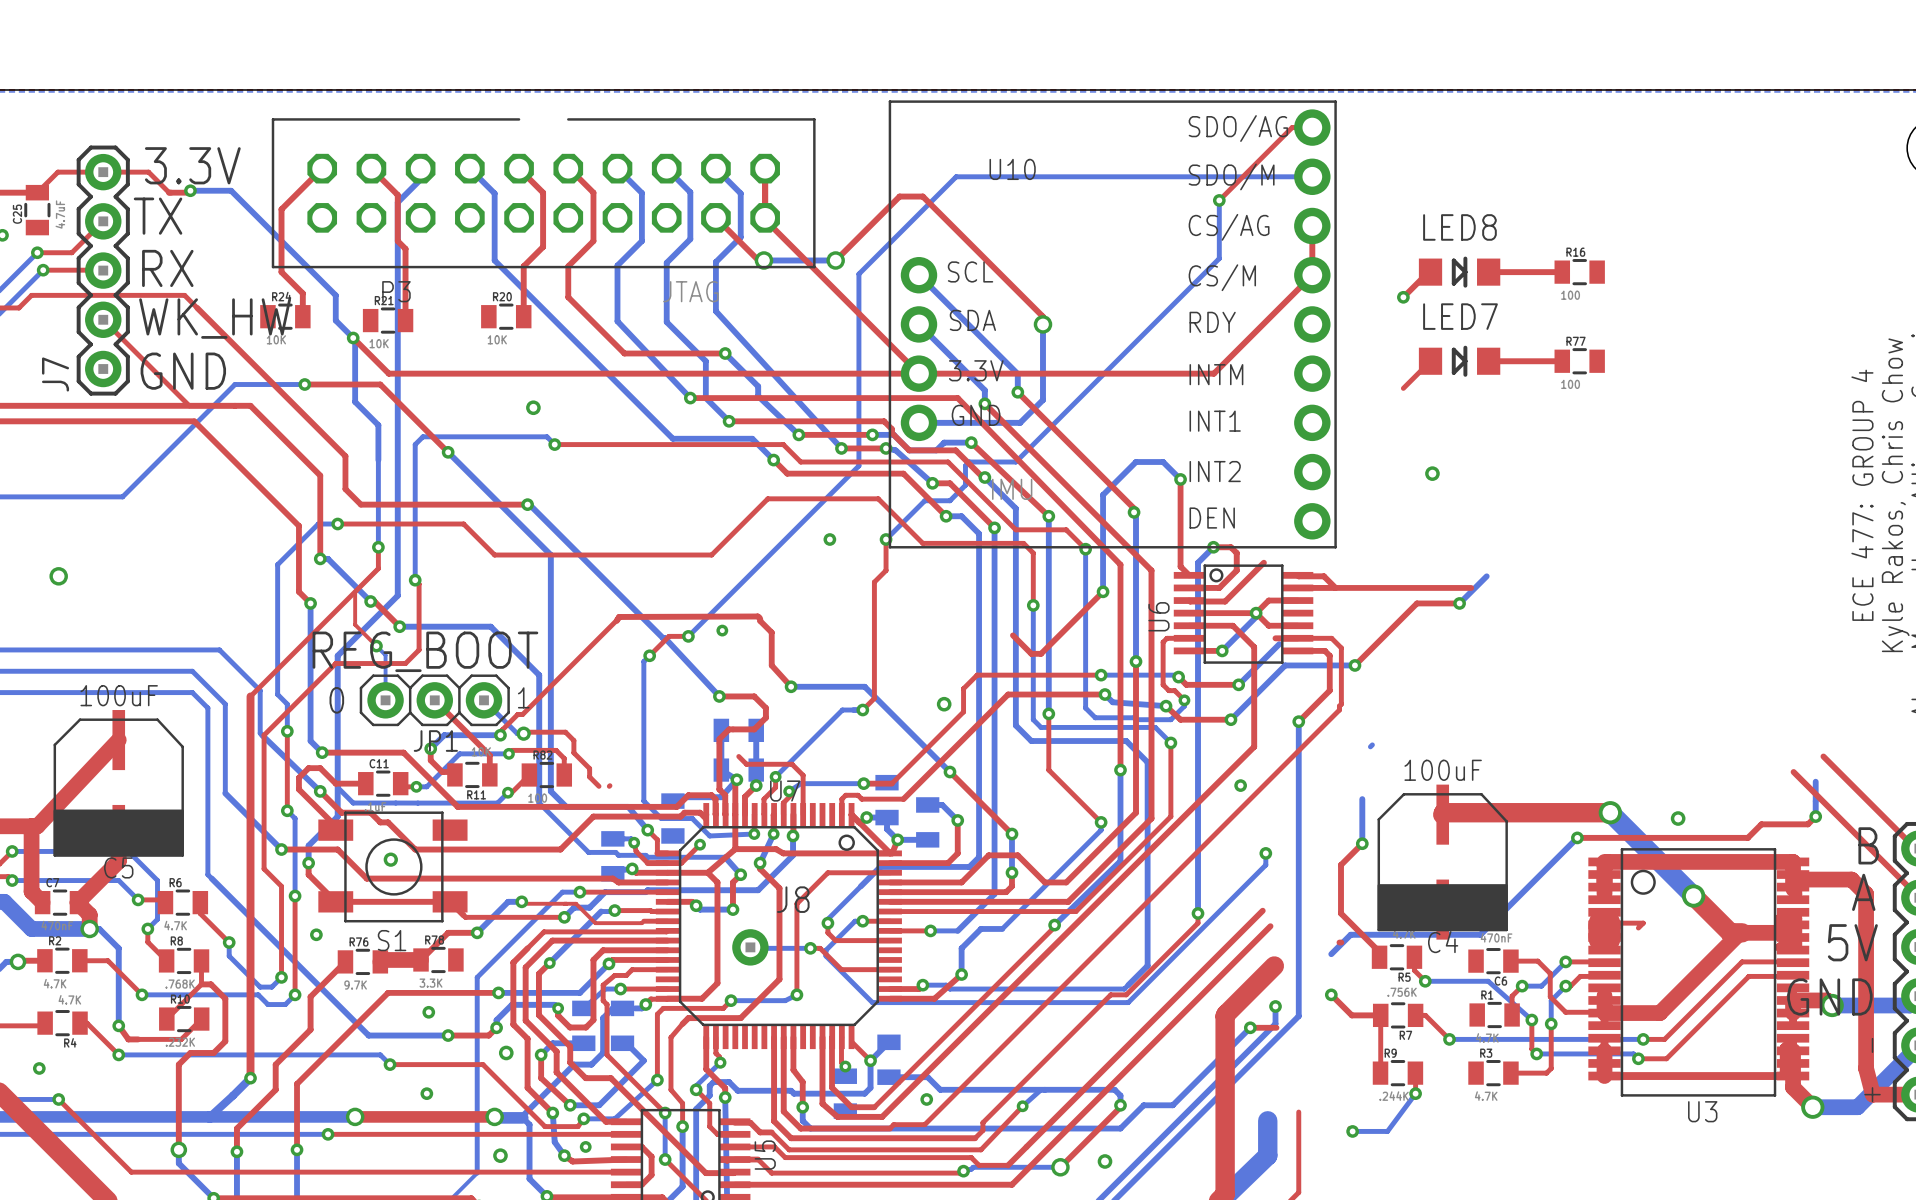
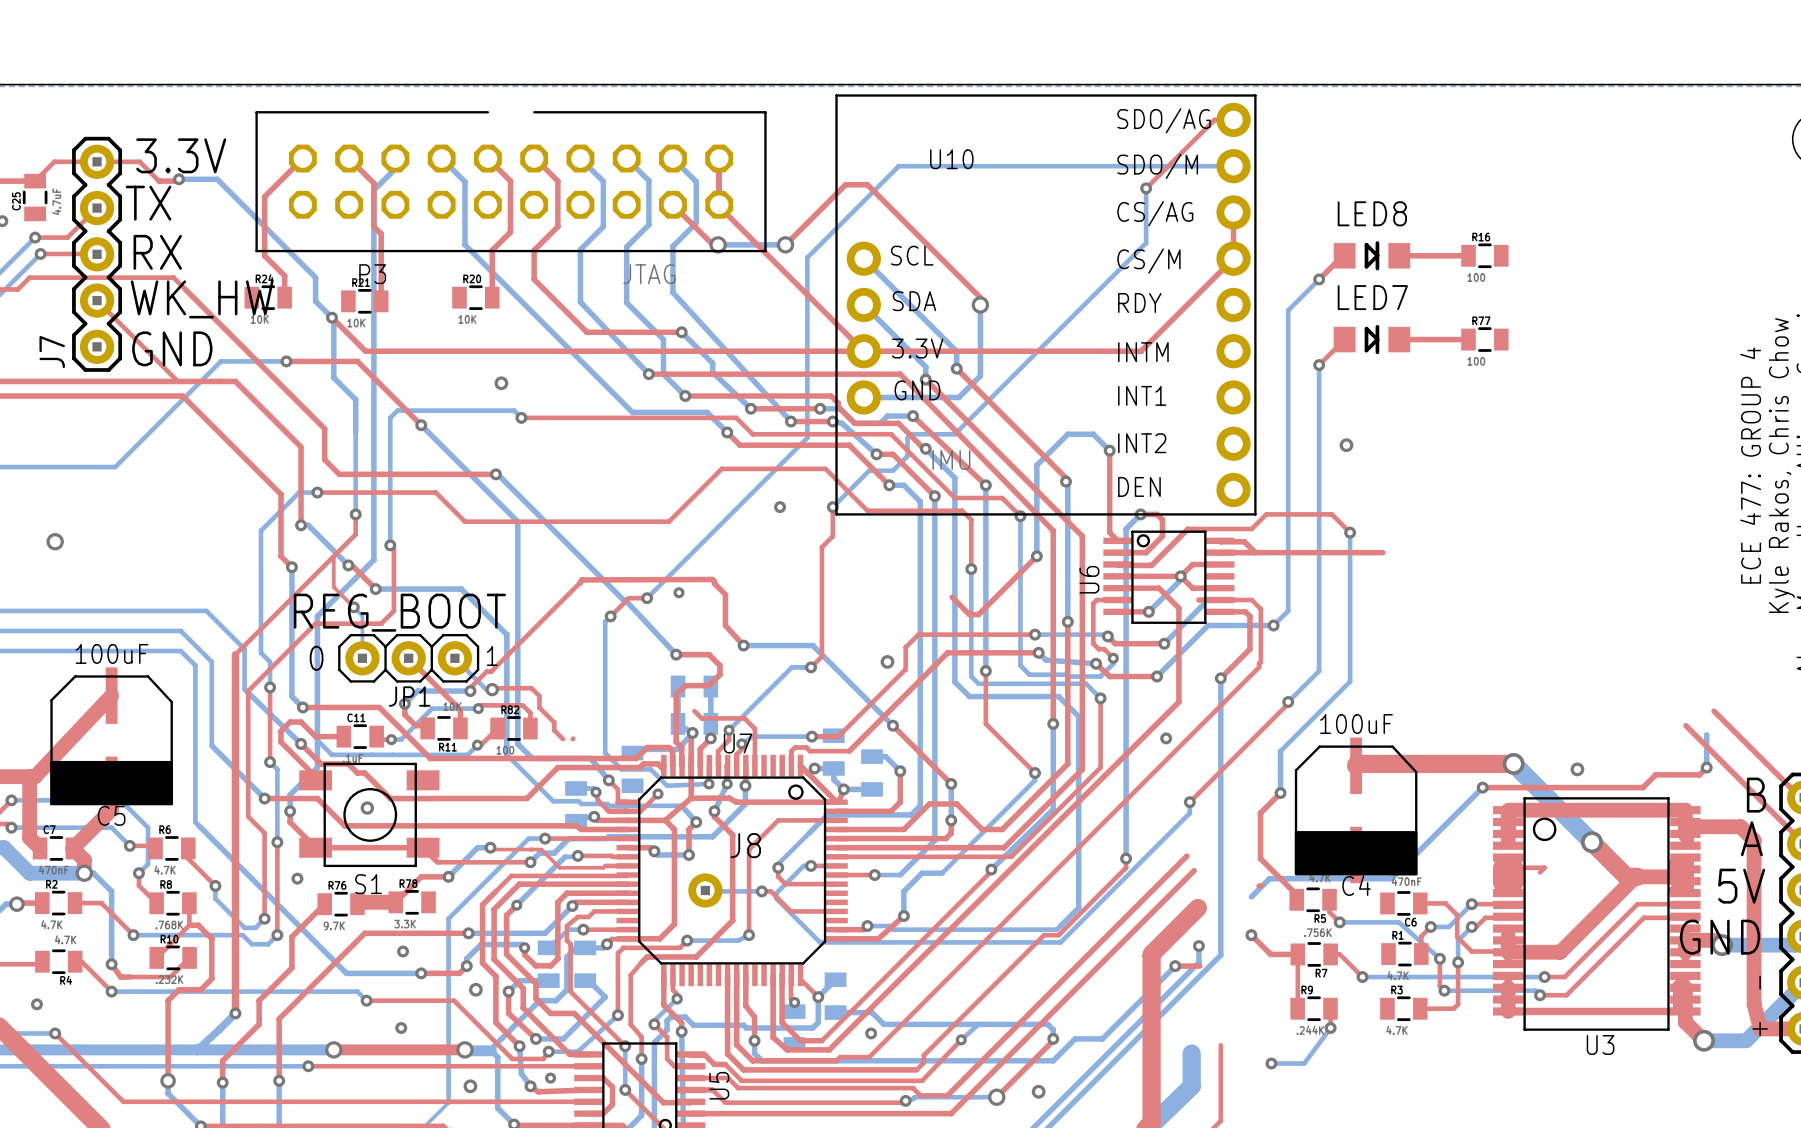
bottom track: none -> (1319, 279) (1288, 310) (1288, 610) (1273, 625)
bottom track: none -> (1319, 365) (1319, 671) (1290, 700)
via: none -> (1319, 365)
top track: none -> (1188, 528) (1251, 528) (1266, 514) (1331, 514) (1350, 532)
bottom track: none -> (1350, 532) (1350, 681) (1280, 751)
bottom track: (1486, 576) (1459, 603) -> none
top track: (1459, 603) (1416, 603) (1354, 665) -> none
via position: (1459, 603) -> (1350, 532)
top track: none -> (1288, 702) (1189, 802)
via: none -> (1288, 702)

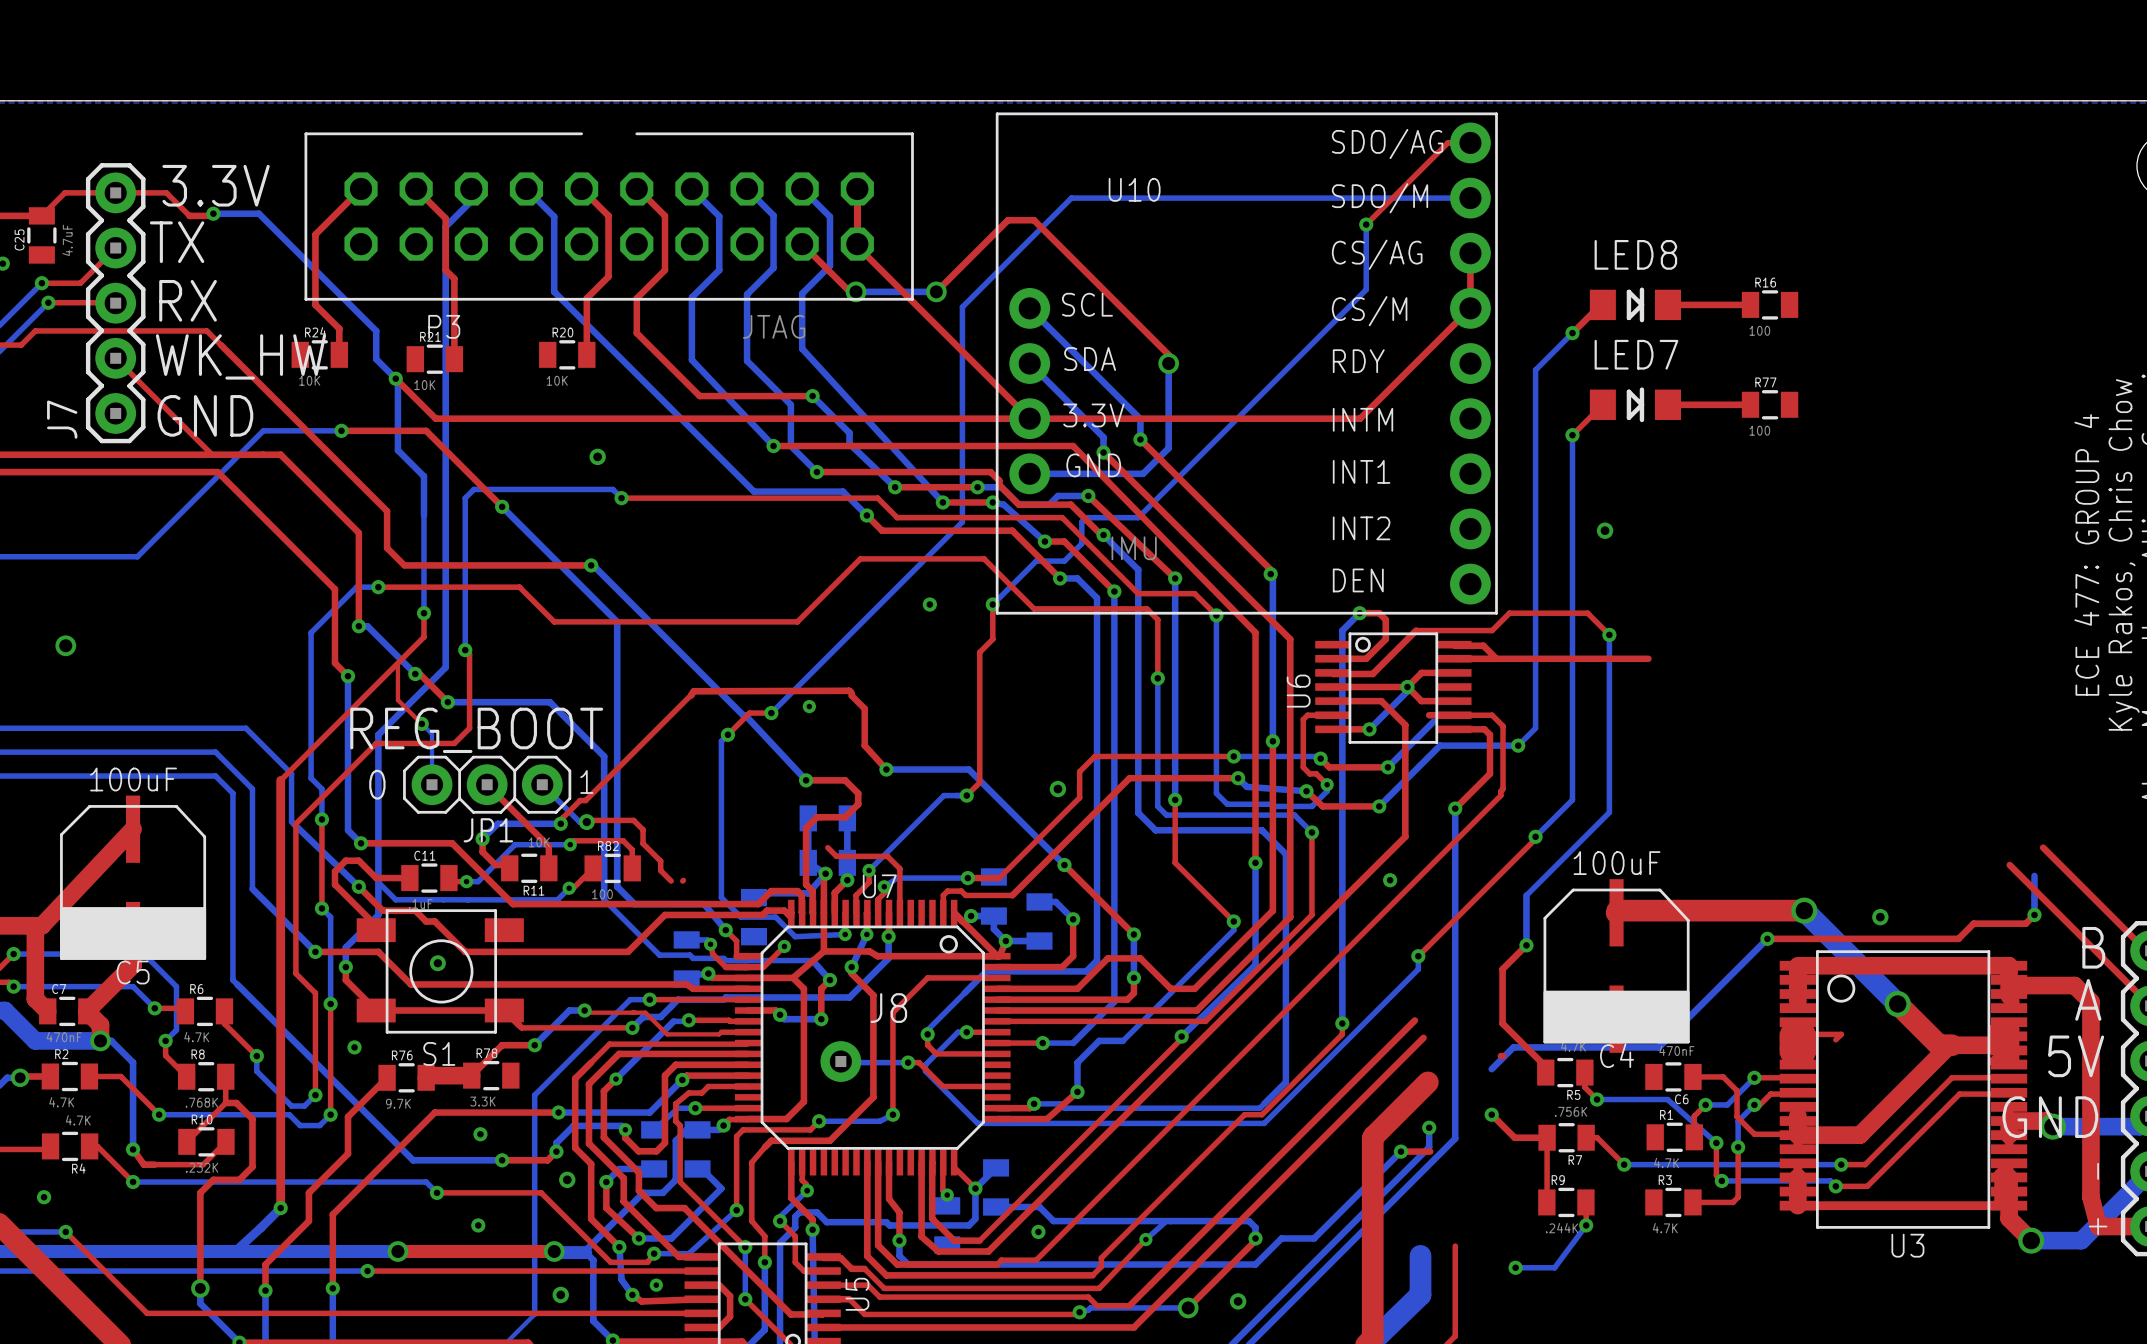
top track: (1109, 450) (1109, 532) (1117, 540) -> none
bottom track: (1109, 450) (1093, 434) (1067, 434) (1036, 465) (1036, 556) -> none
via: (1109, 450) -> none
top track: (1036, 556) (978, 614) (969, 614) (952, 597) -> none
via: (1036, 556) -> none

